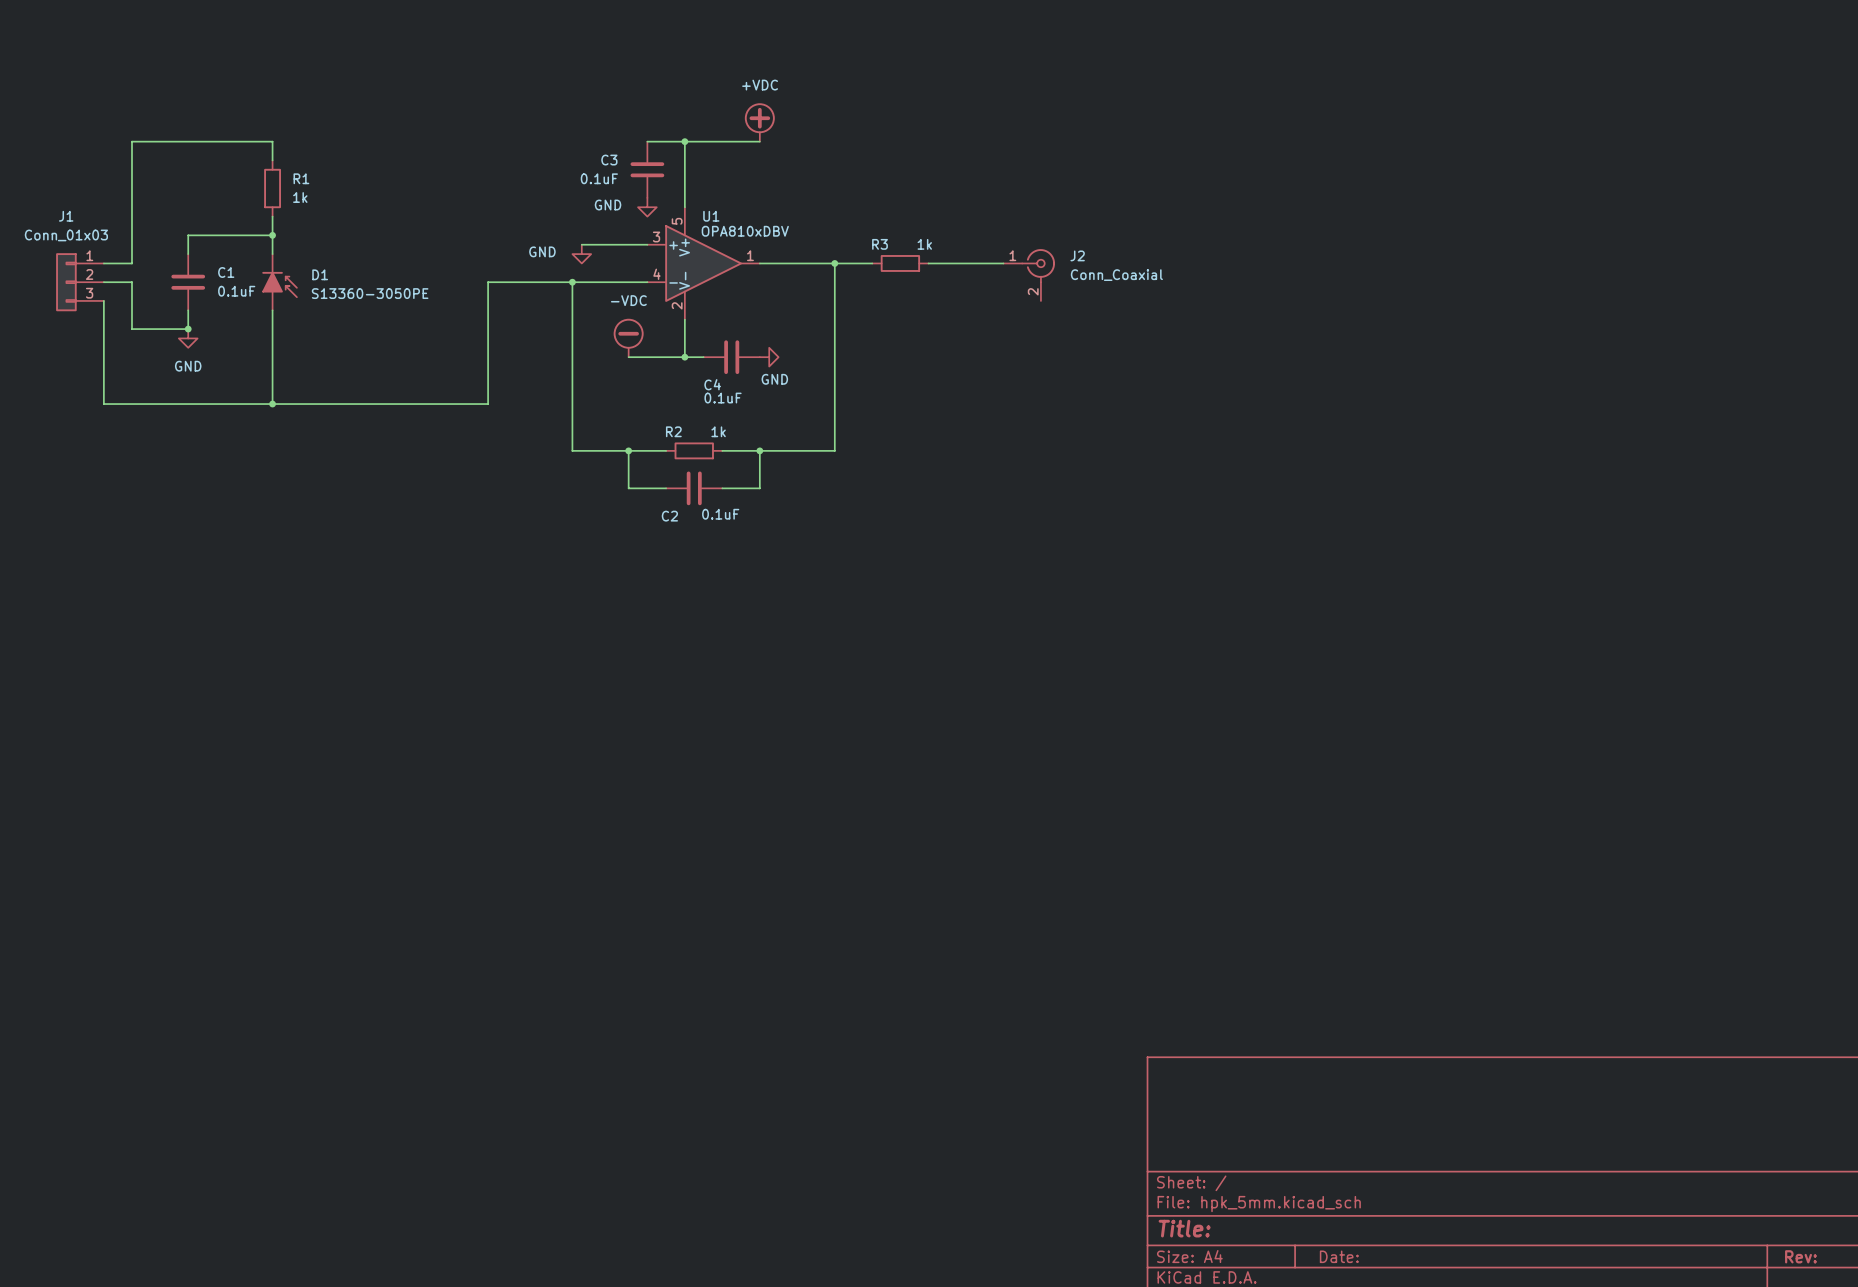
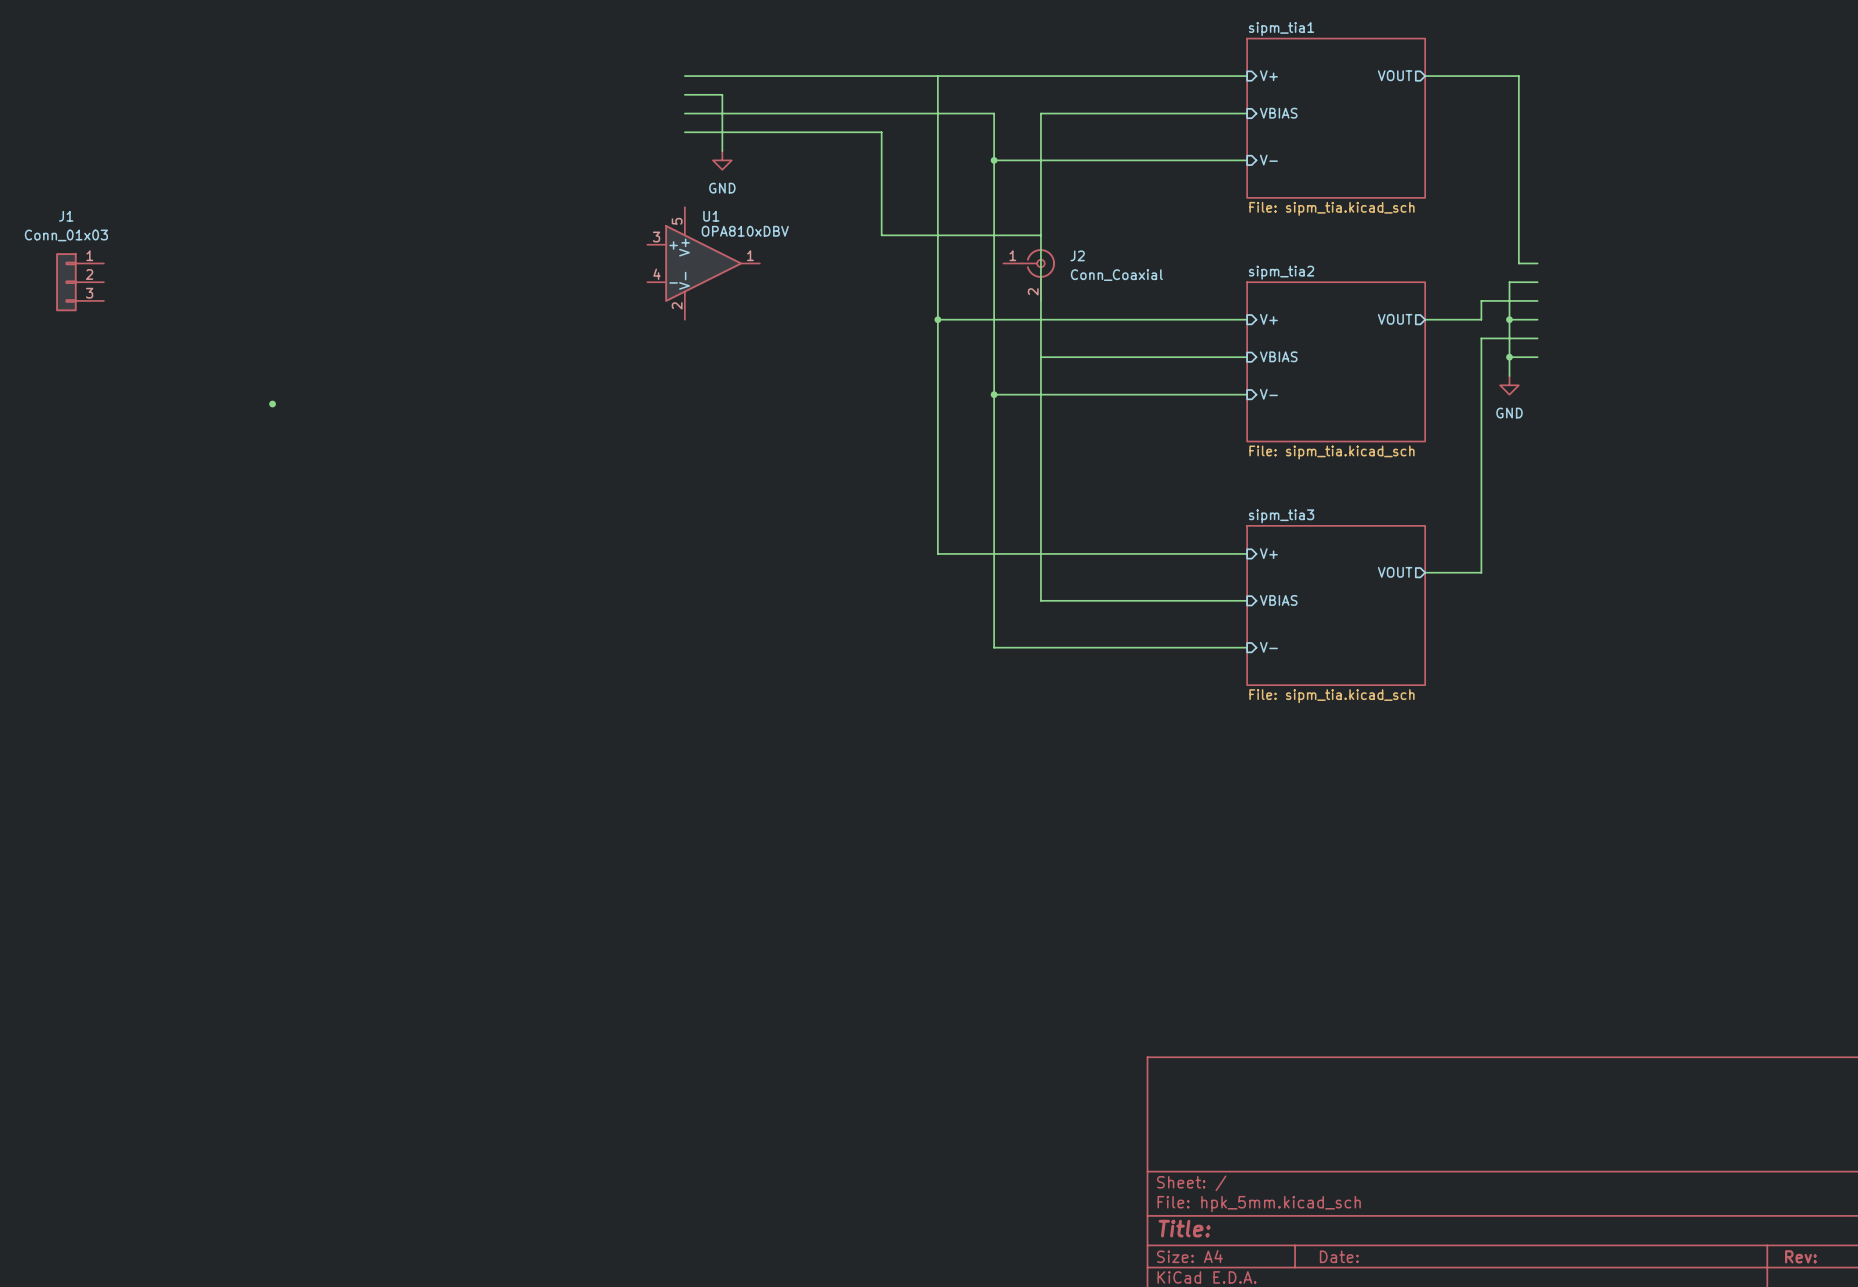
sheet pin: none -> V+ (1268, 75)
sheet pin: none -> VOUT (1395, 75)
wire: none -> (684, 76) (1247, 76)
wire: none -> (937, 76) (937, 553) (1247, 553)
wire: none -> (1425, 76) (1518, 76) (1518, 263) (1537, 263)
wire: none -> (684, 94) (722, 94) (722, 151)
wire: none -> (684, 113) (994, 113) (994, 647) (1247, 647)
wire: none -> (1247, 113) (1040, 113) (1040, 600) (1247, 600)
sheet pin: none -> VBIAS (1278, 113)
sheet sipm_tia1: none -> File: sipm_tia.kicad_sch (1336, 118)
power symbol: +VDC (759, 122) -> none
wire: none -> (684, 132) (881, 132) (881, 235) (1040, 235)
wire: (647, 141) (759, 141) -> none
wire: (684, 141) (684, 207) -> none
junction: (684, 141) -> none
wire: (272, 160) (272, 141) (132, 141) (132, 263) (103, 263) -> none
power symbol: none -> GND (722, 160)
wire: none -> (994, 160) (1247, 160)
junction: none -> (994, 160)
sheet pin: none -> V- (1268, 160)
C3: 0.1uF (647, 169) -> none
R1: 1k (272, 188) -> none
power symbol: GND (647, 207) -> none
wire: (272, 216) (272, 254) -> none
wire: (272, 235) (188, 235) (188, 254) -> none
junction: (272, 235) -> none
wire: (581, 244) (647, 244) -> none
power symbol: GND (581, 254) -> none
wire: (759, 263) (872, 263) -> none
wire: (834, 263) (834, 450) (722, 450) -> none
junction: (834, 263) -> none
R3: 1k (900, 263) -> none
wire: (928, 263) (1003, 263) -> none
wire: (103, 282) (132, 282) (132, 329) (188, 329) (188, 310) -> none
C1: 0.1uF (188, 282) -> none
D1: S13360-3050PE (279, 282) -> none
wire: (572, 282) (572, 450) (666, 450) -> none
junction: (572, 282) -> none
wire: (647, 282) (488, 282) (488, 404) (103, 404) (103, 300) -> none
wire: none -> (1537, 282) (1509, 282) (1509, 375)
wire: none -> (1537, 300) (1481, 300) (1481, 319) (1425, 319)
wire: (272, 310) (272, 404) -> none
wire: (684, 319) (684, 357) -> none
wire: none -> (937, 319) (1247, 319)
junction: none -> (937, 319)
sheet pin: none -> V+ (1268, 319)
sheet pin: none -> VOUT (1395, 319)
wire: none -> (1509, 319) (1537, 319)
junction: none -> (1509, 319)
junction: (188, 329) -> none
power symbol: -VDC (628, 337) -> none
power symbol: GND (188, 338) -> none
wire: none -> (1537, 338) (1481, 338) (1481, 572) (1425, 572)
sheet pin: none -> VBIAS (1278, 356)
wire: (628, 357) (703, 357) -> none
junction: (684, 357) -> none
C4: 0.1uF (731, 357) -> none
power symbol: GND (769, 357) -> none
wire: none -> (1040, 357) (1247, 357)
wire: none -> (1509, 357) (1537, 357)
junction: none -> (1509, 357)
sheet sipm_tia2: none -> File: sipm_tia.kicad_sch (1336, 361)
power symbol: none -> GND (1509, 385)
wire: none -> (994, 394) (1247, 394)
junction: none -> (994, 394)
sheet pin: none -> V- (1268, 394)
wire: (628, 450) (628, 488) (666, 488) -> none
junction: (628, 450) -> none
R2: 1k (694, 450) -> none
wire: (759, 450) (759, 488) (722, 488) -> none
junction: (759, 450) -> none
C2: 0.1uF (694, 488) -> none
sheet pin: none -> V+ (1268, 553)
sheet pin: none -> VOUT (1395, 572)
sheet pin: none -> VBIAS (1278, 600)
sheet sipm_tia3: none -> File: sipm_tia.kicad_sch (1336, 605)
sheet pin: none -> V- (1268, 647)

